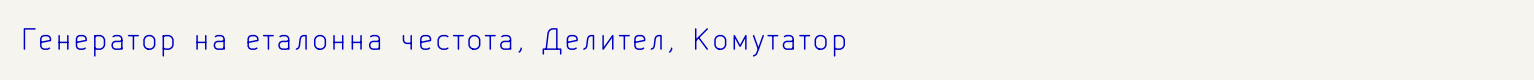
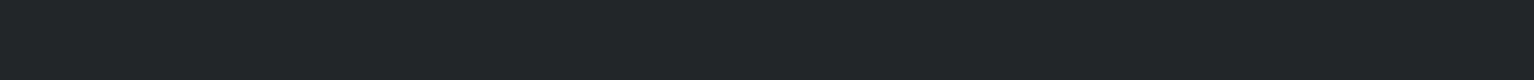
text: Генератор на еталонна честота, Делител, Комутатор (434, 42) -> none

